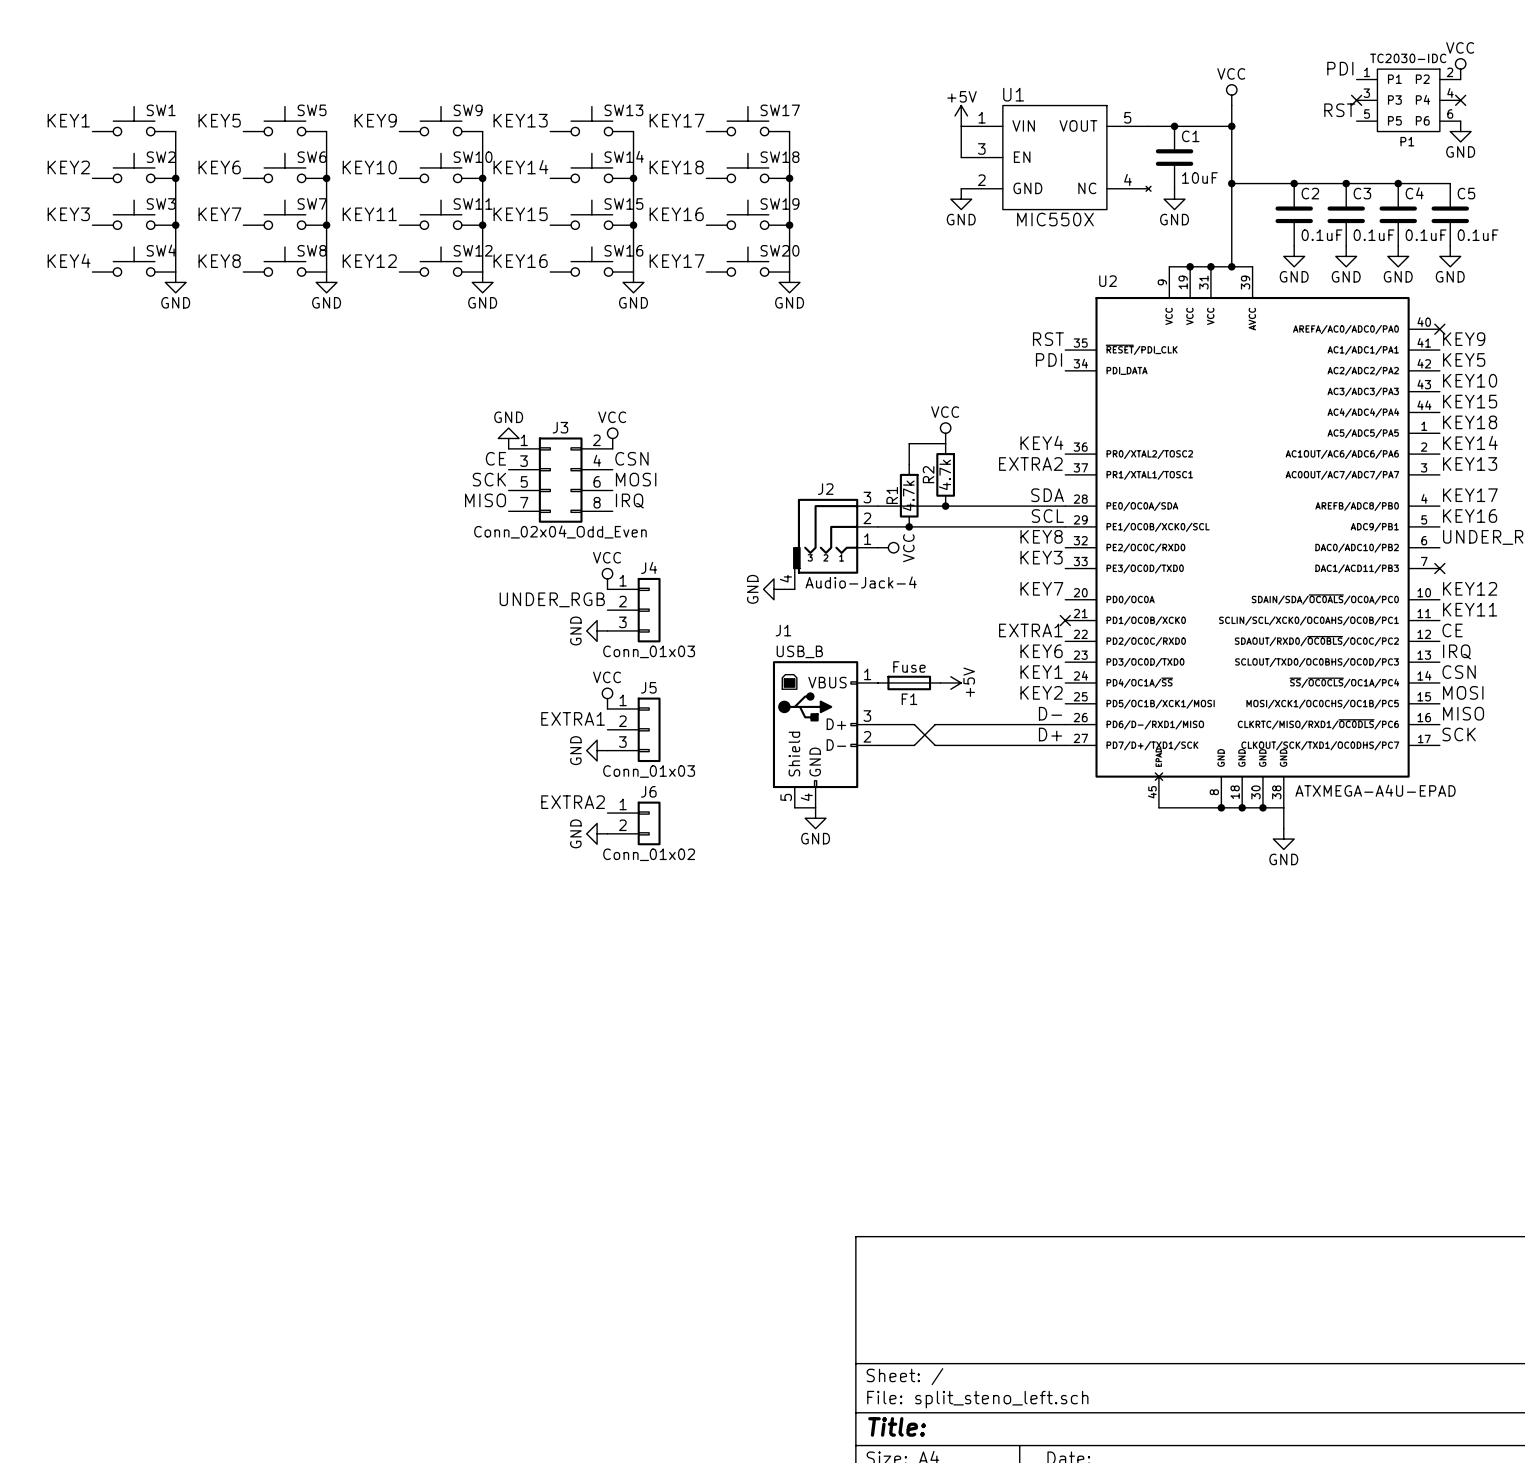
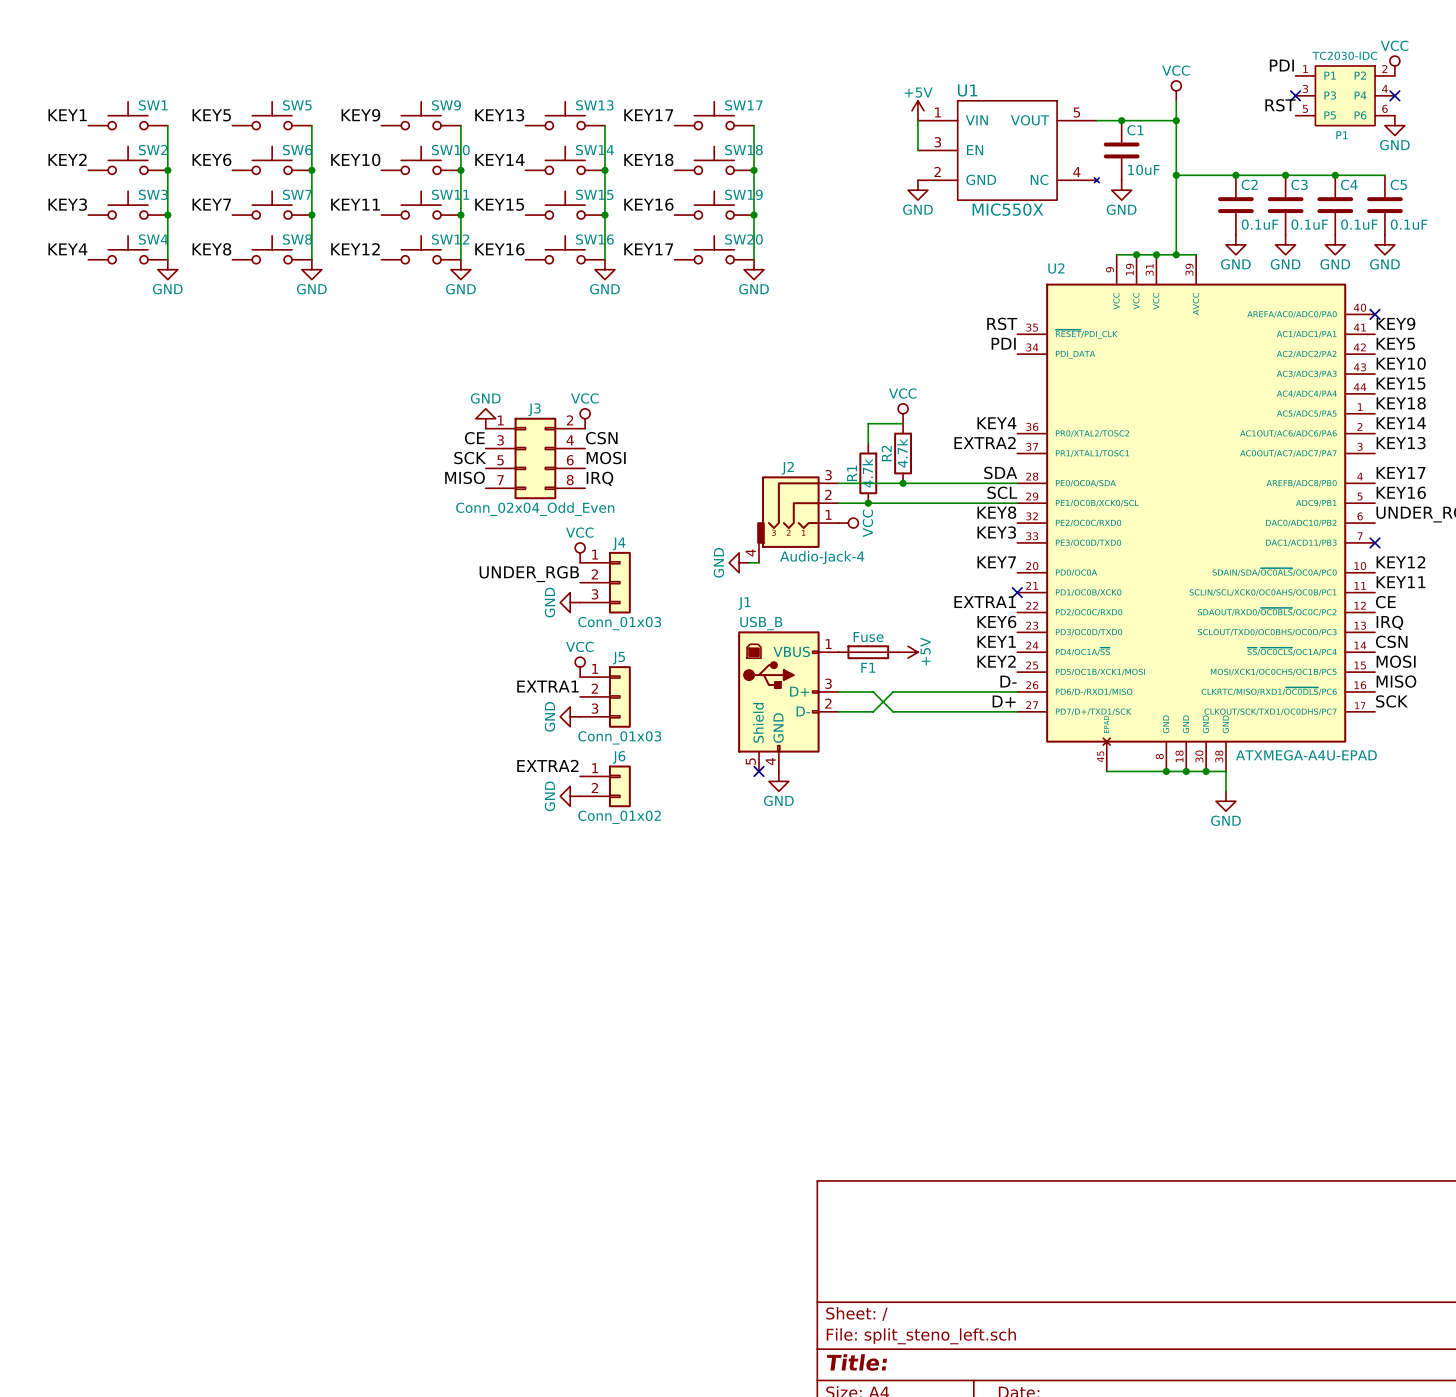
wire: (794, 807) (815, 807) -> none
no-connect mark: none -> (758, 771)

